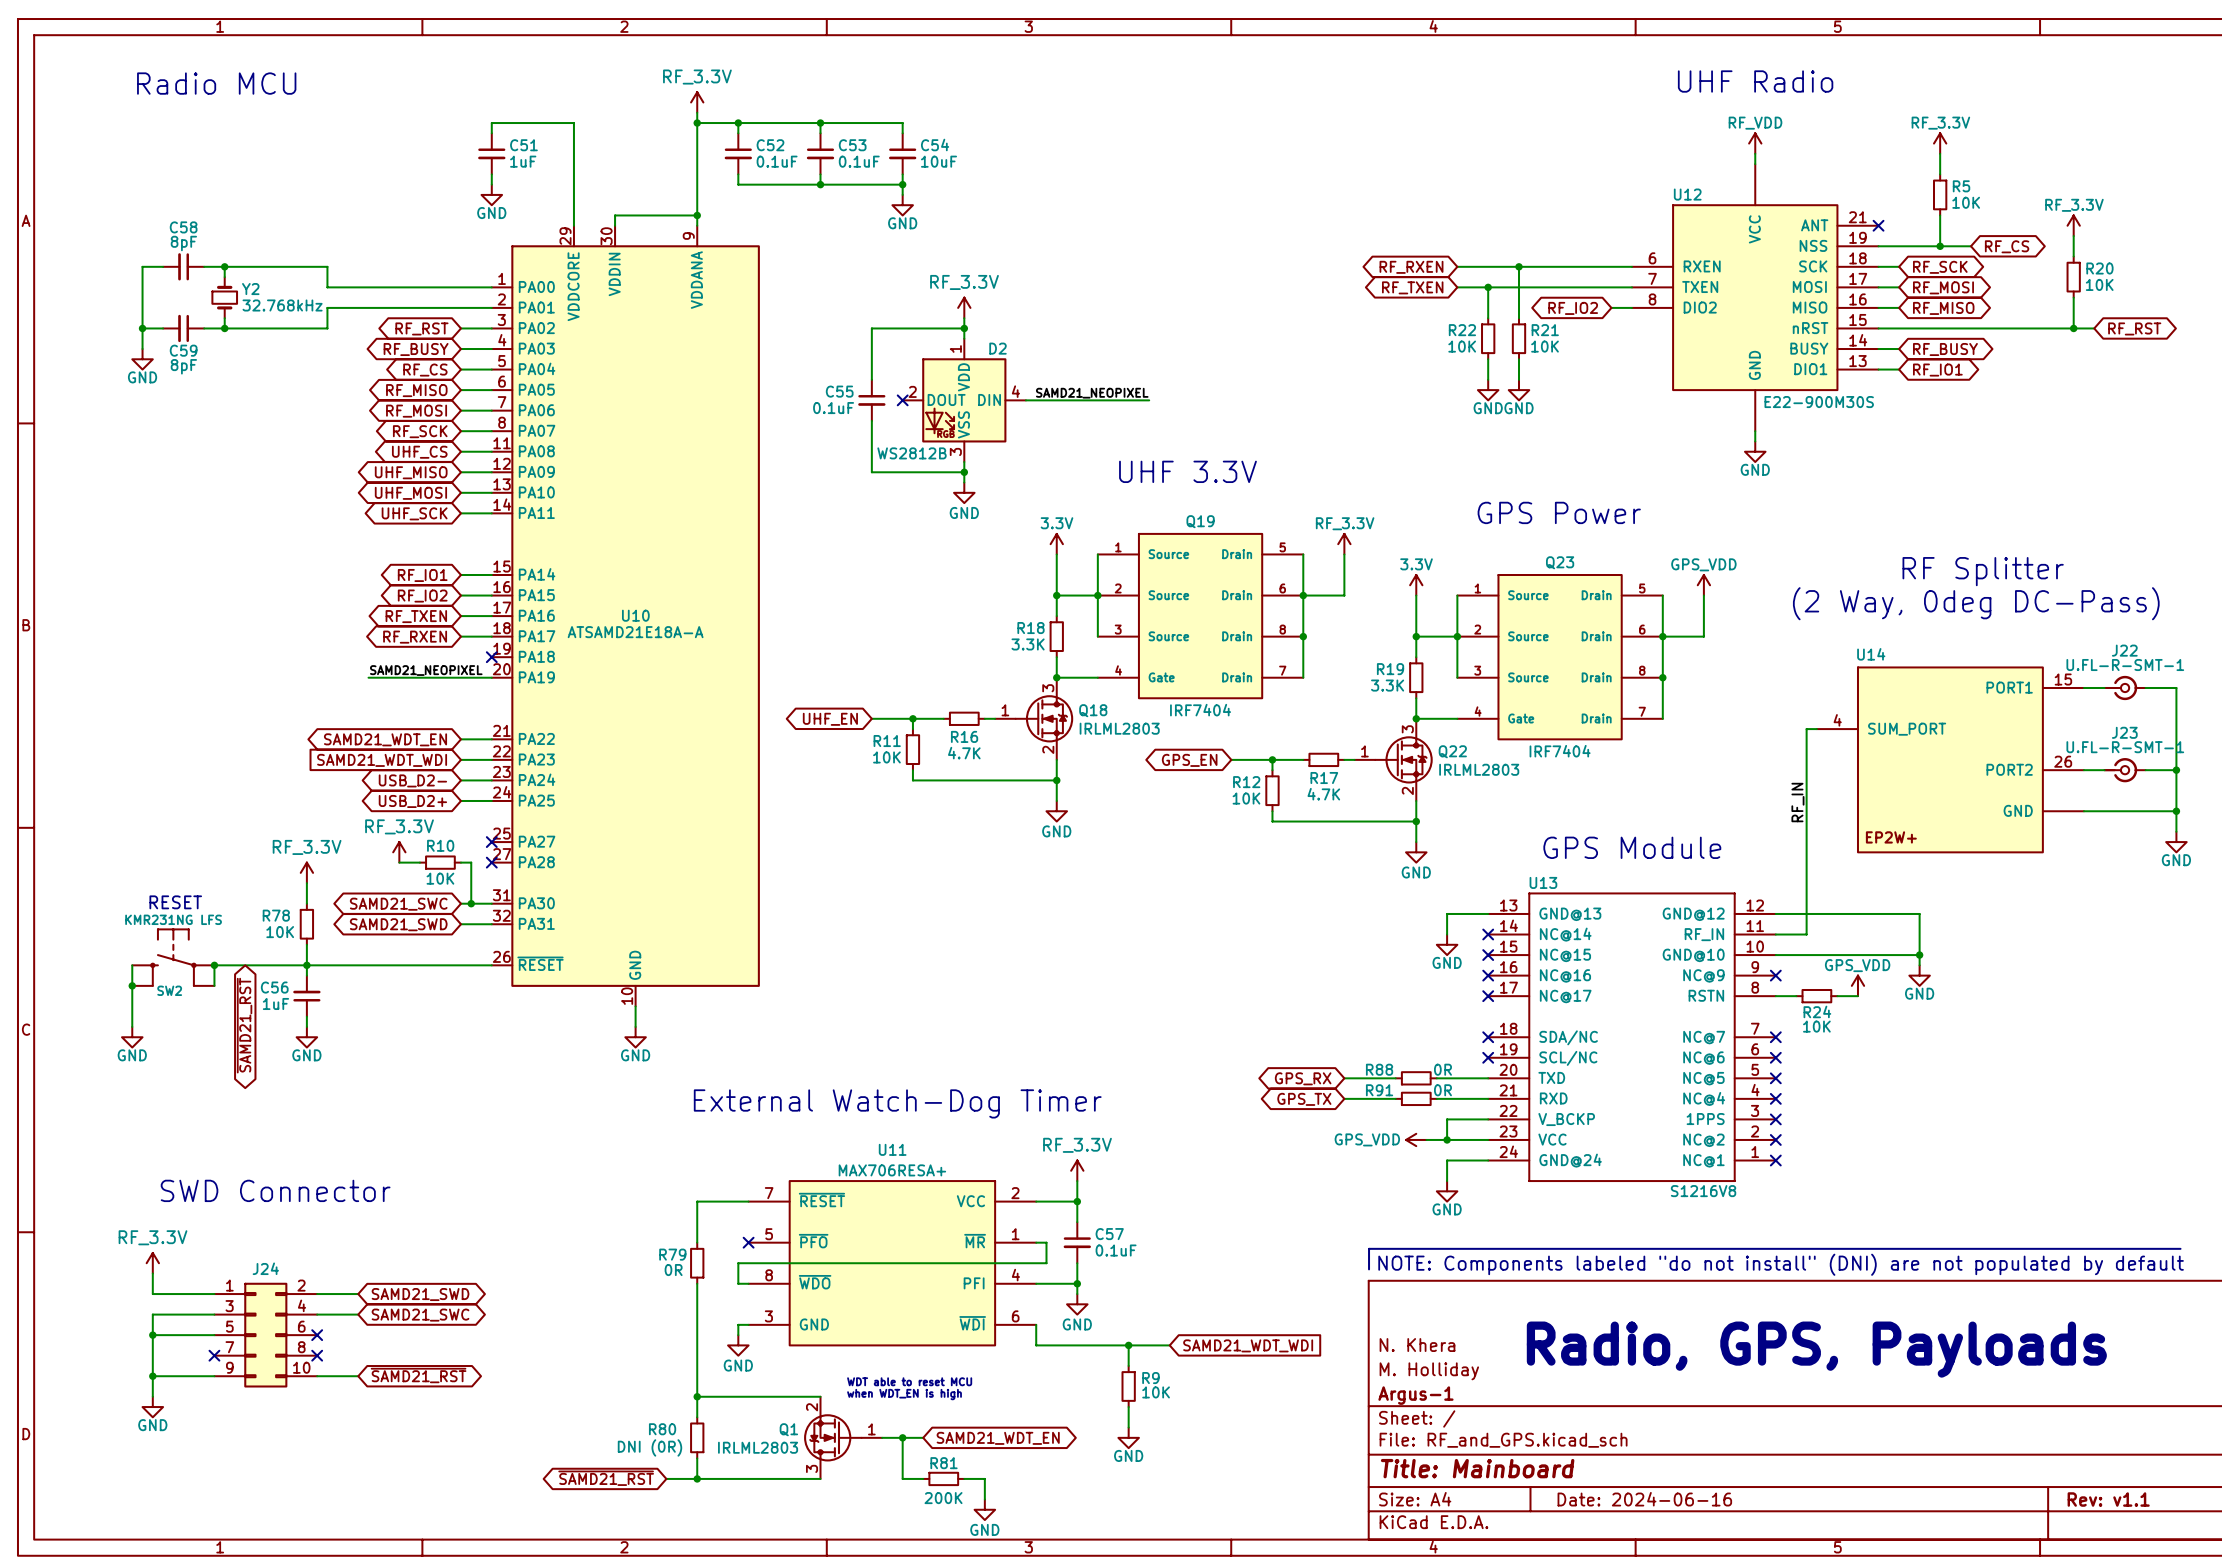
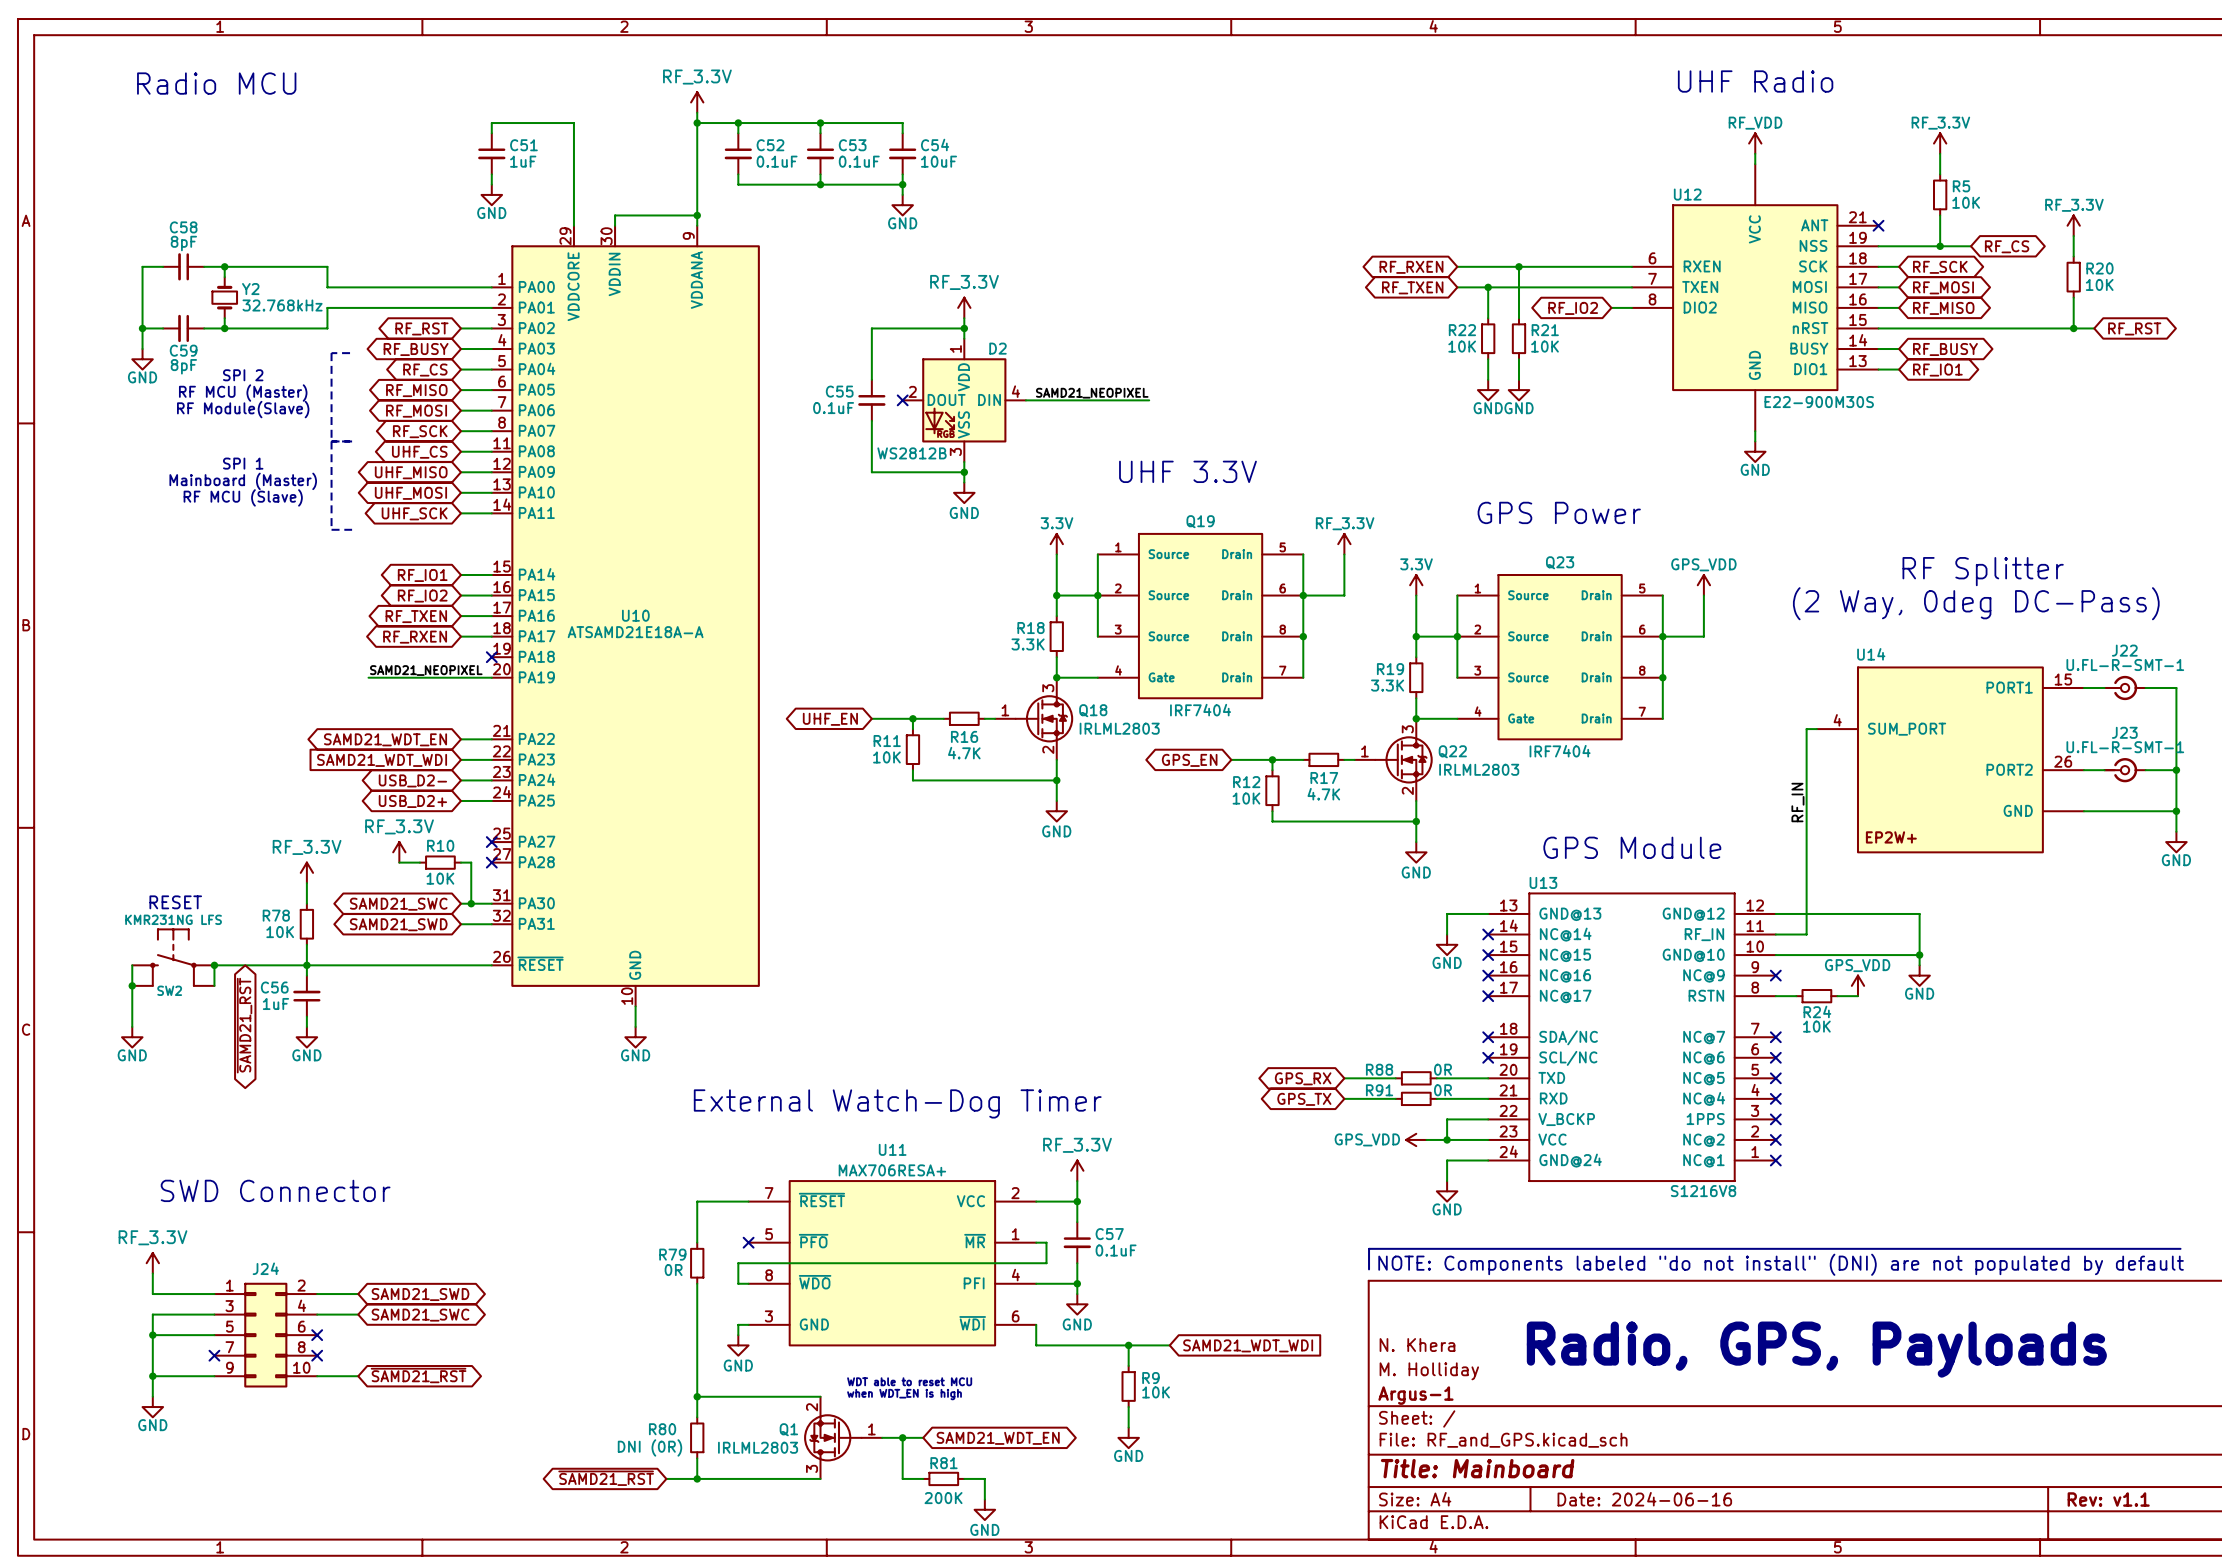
line: none -> (350, 353) (331, 353) (331, 529) (352, 529)
text: none -> SPI 2 (243, 375)
text: none -> RF MCU (Master) (243, 393)
text: none -> RF Module(Slave) (243, 409)
line: none -> (331, 441) (352, 441)
text: none -> SPI 1 (243, 463)
text: none -> Mainboard (Master) (243, 481)
text: none -> RF MCU (Slave) (243, 497)

